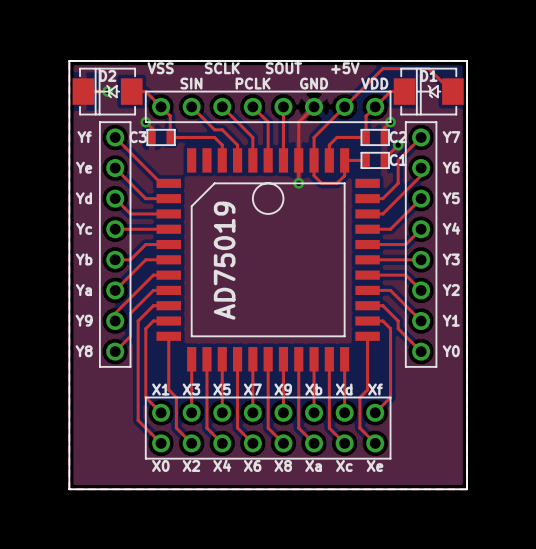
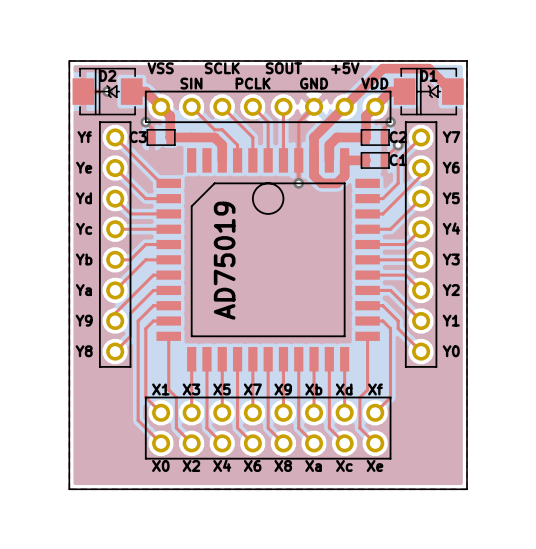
top track width: thin (131, 91) (145, 91) (170, 116) (170, 137) (214, 137) (222, 145) (222, 160) -> thick (131, 91) (145, 91) (170, 116) (170, 137) (214, 137) (222, 145) (222, 160)
top track width: thin (404, 91) (390, 91) (366, 116) (366, 137) (336, 137) (329, 145) (329, 160) -> thick (404, 91) (390, 91) (366, 116) (366, 137) (336, 137) (329, 145) (329, 160)
top track width: thin (451, 91) (428, 68) (382, 68) (314, 137) (314, 175) (321, 183) (336, 183) (344, 175) (344, 160) (366, 160) -> thick (451, 91) (428, 68) (382, 68) (314, 137) (314, 175) (321, 183) (336, 183) (344, 175) (344, 160) (366, 160)

